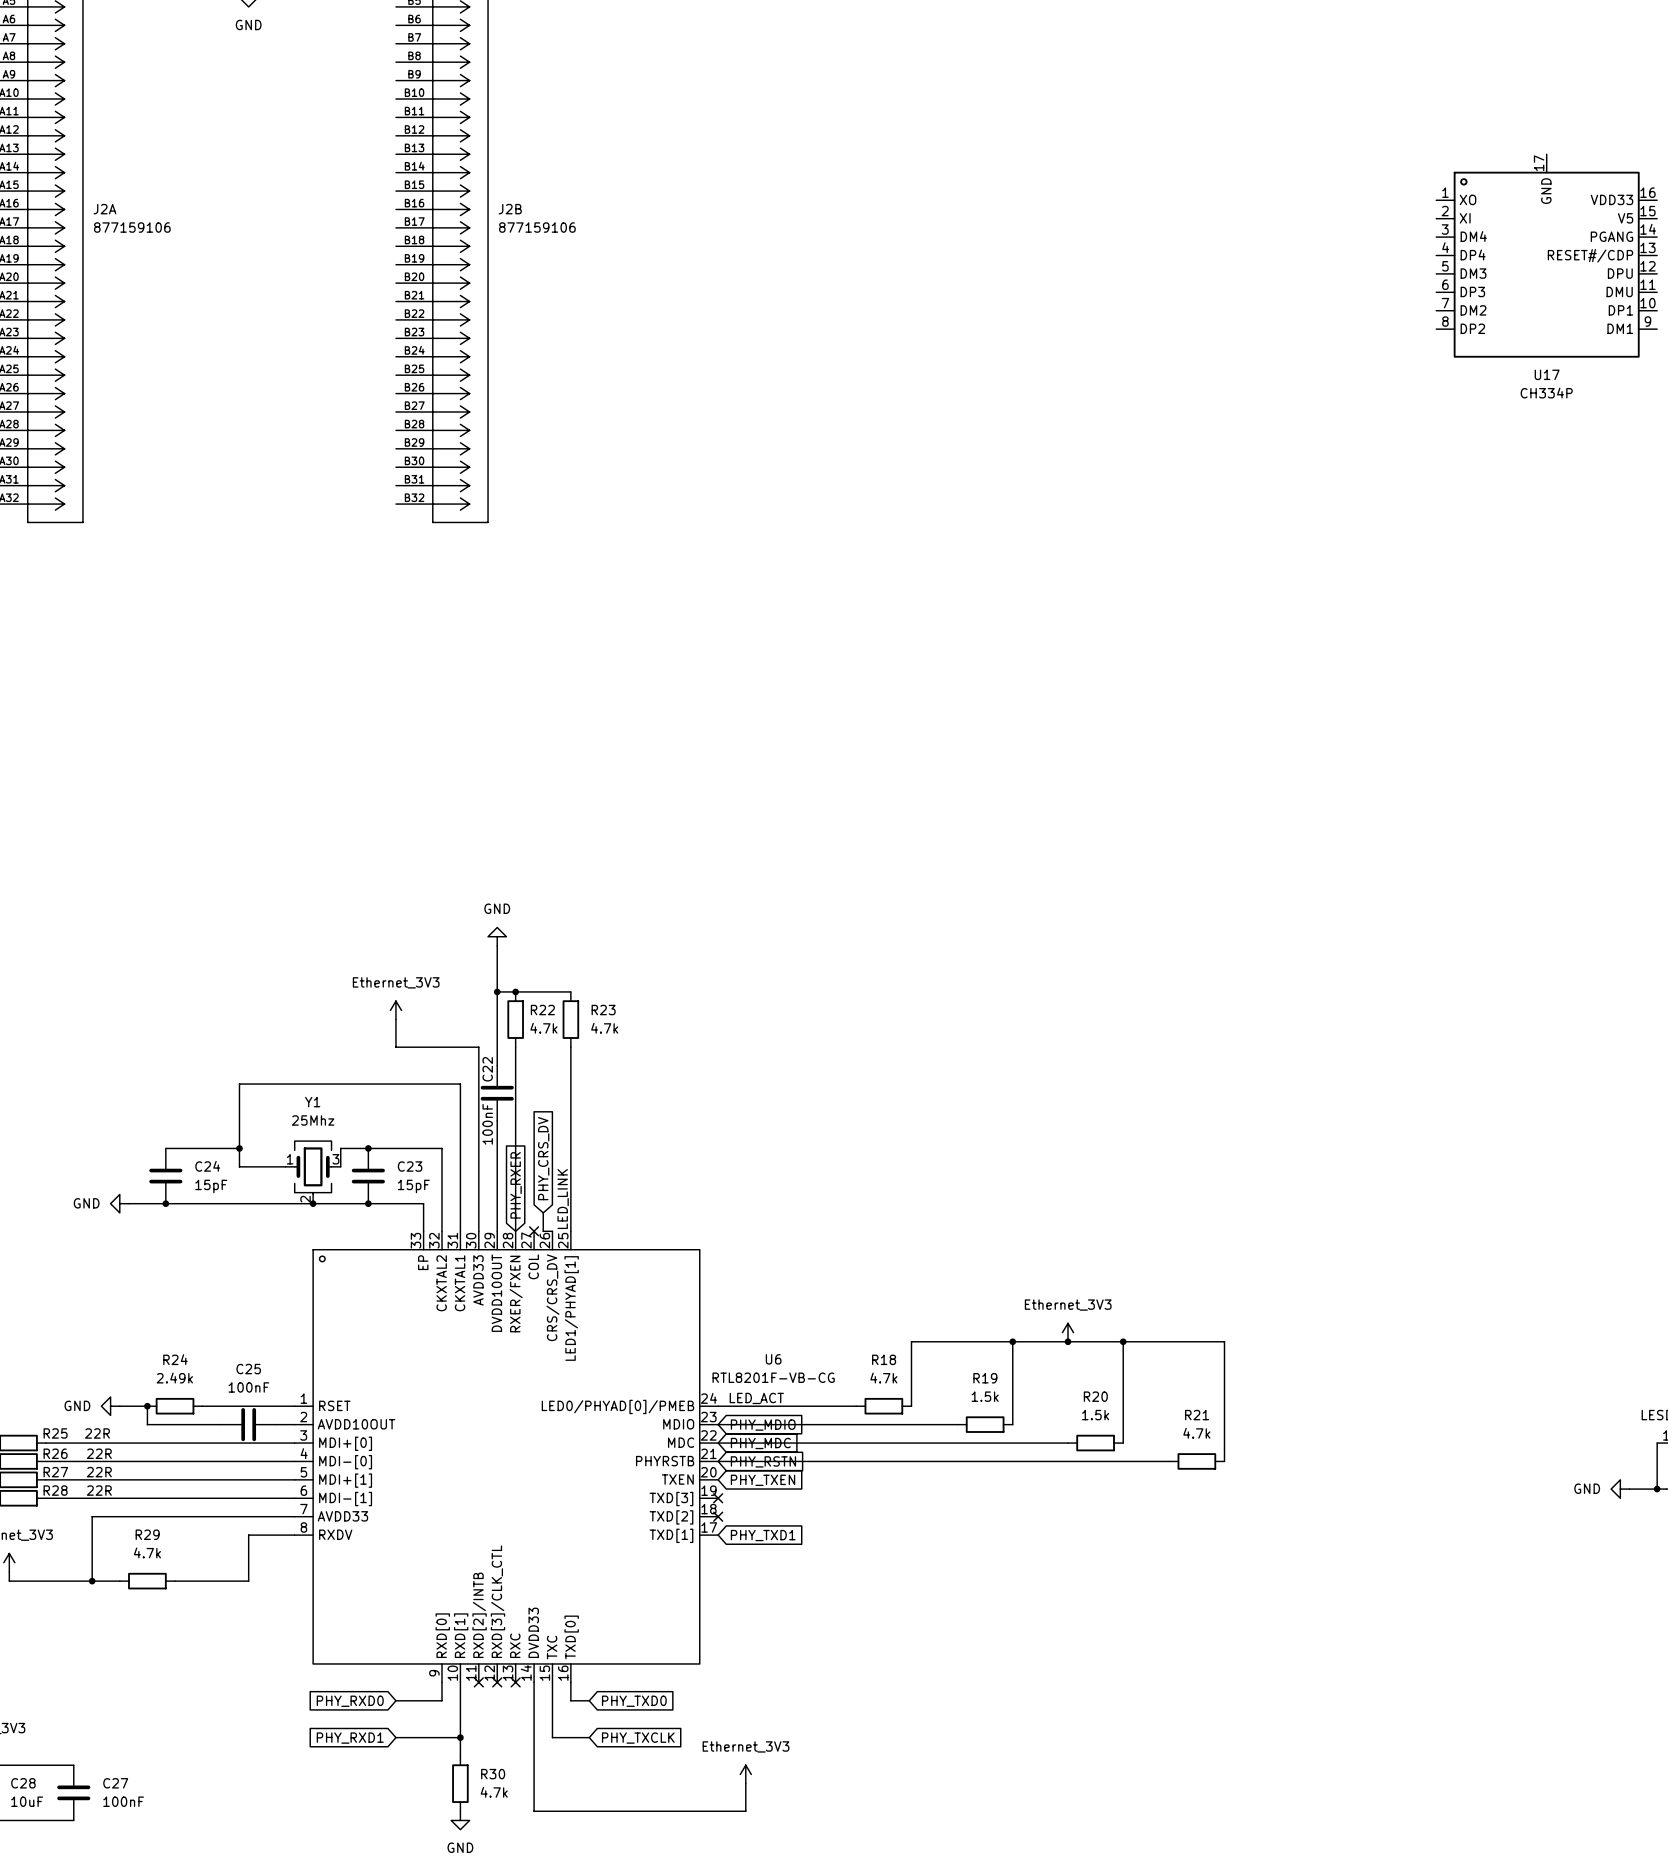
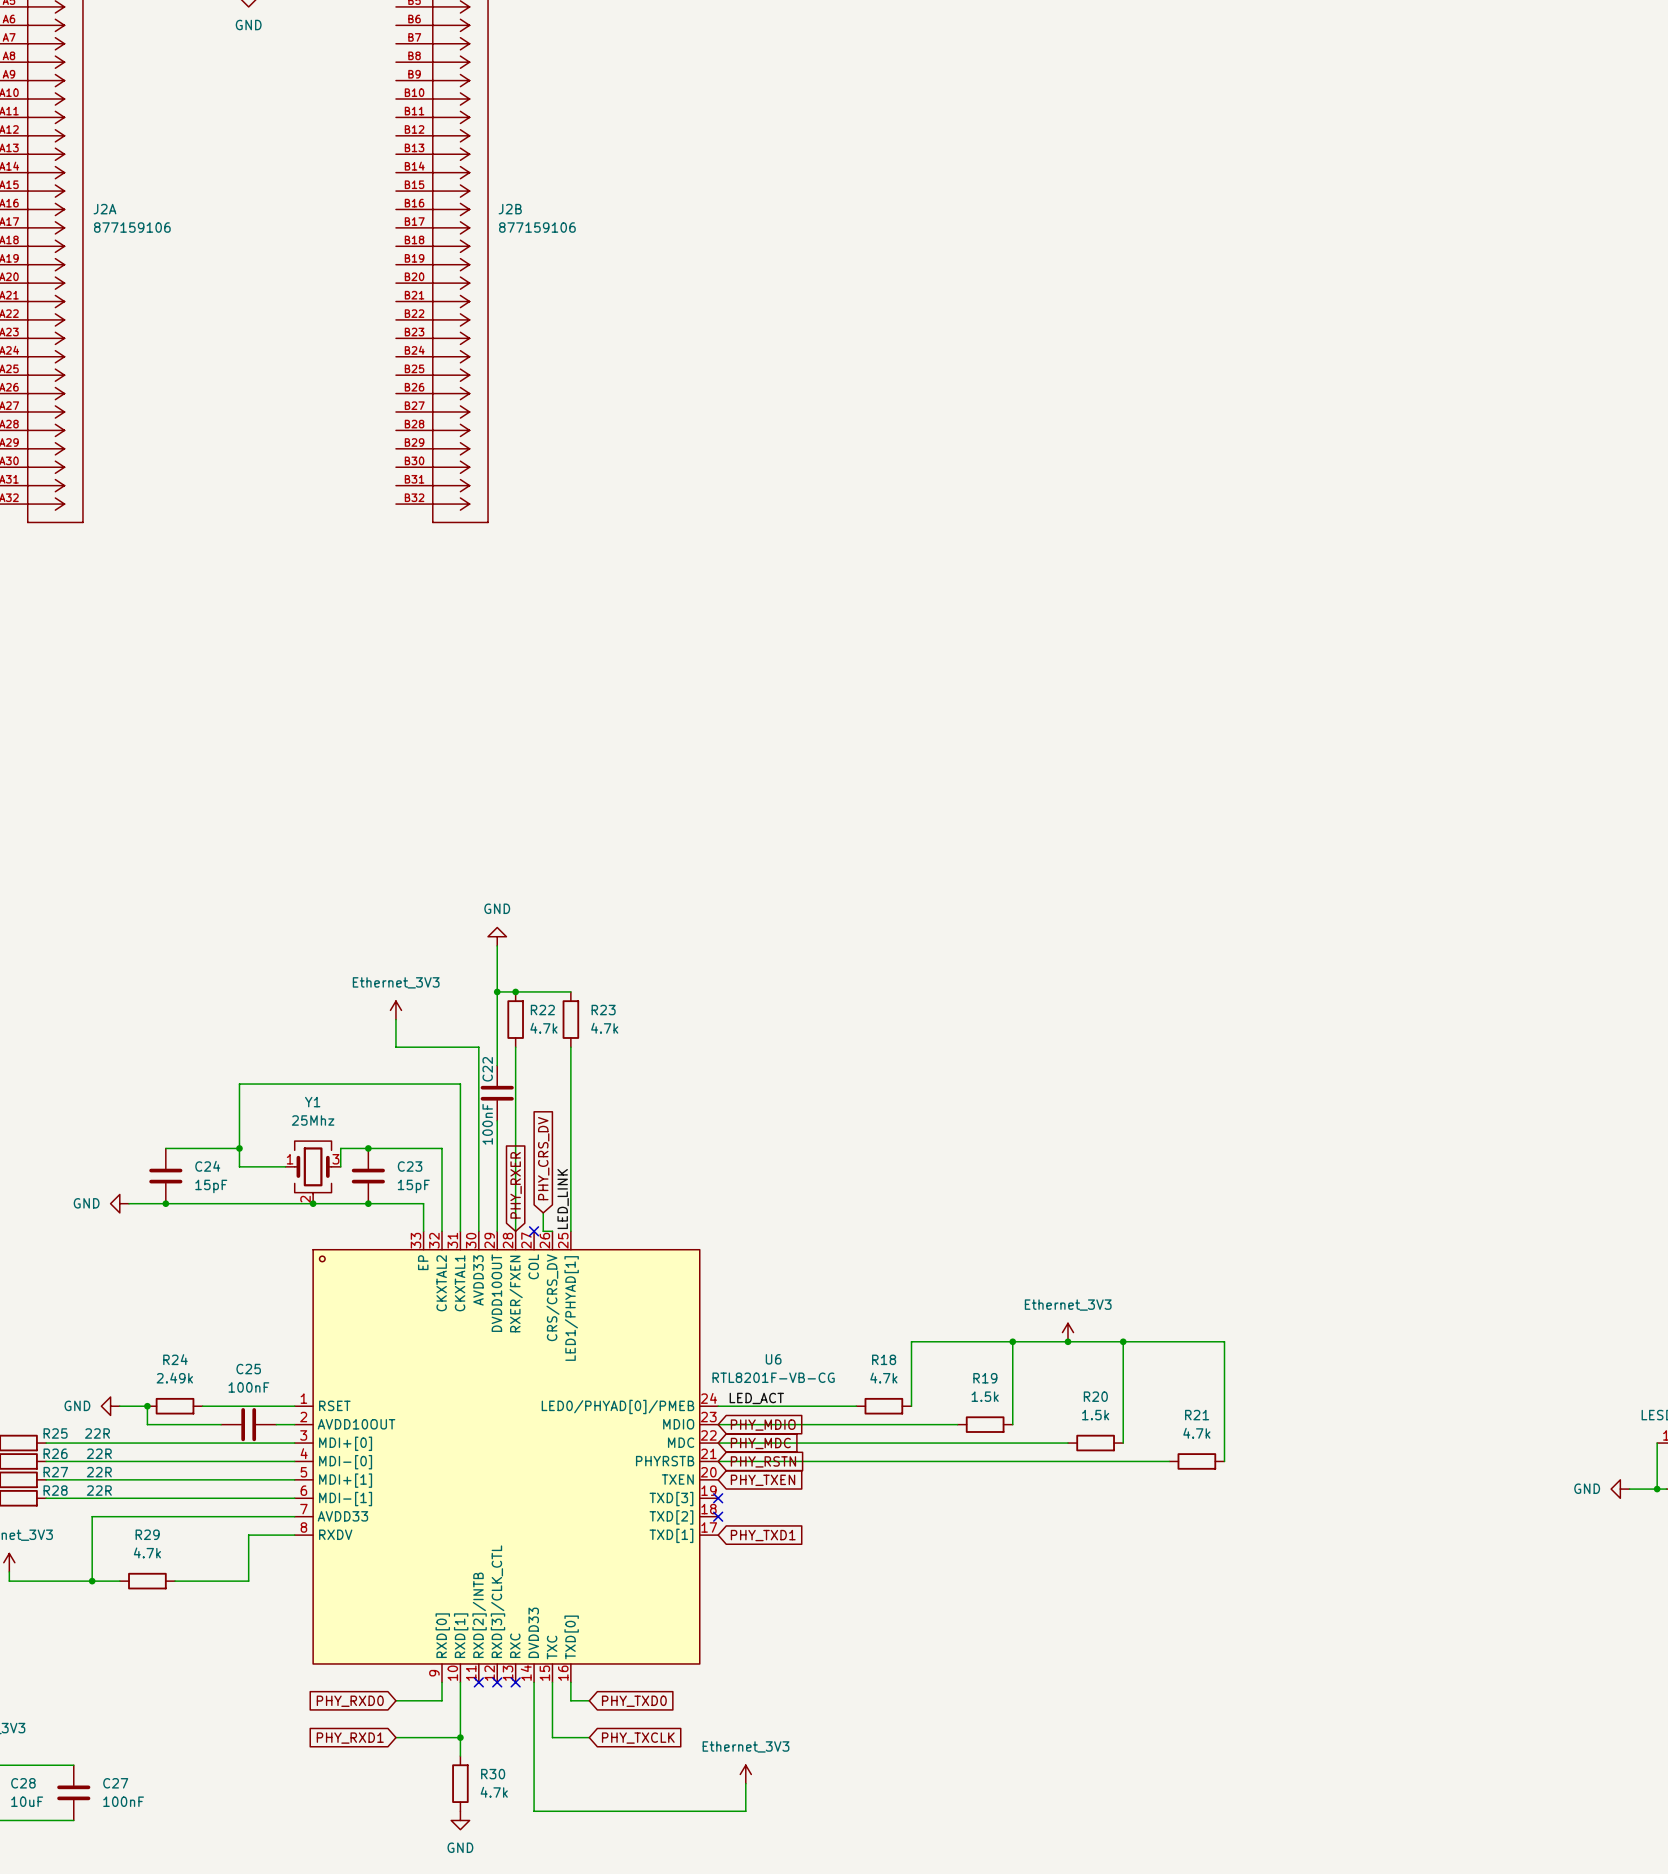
U17: CH334P (1546, 255) -> none

